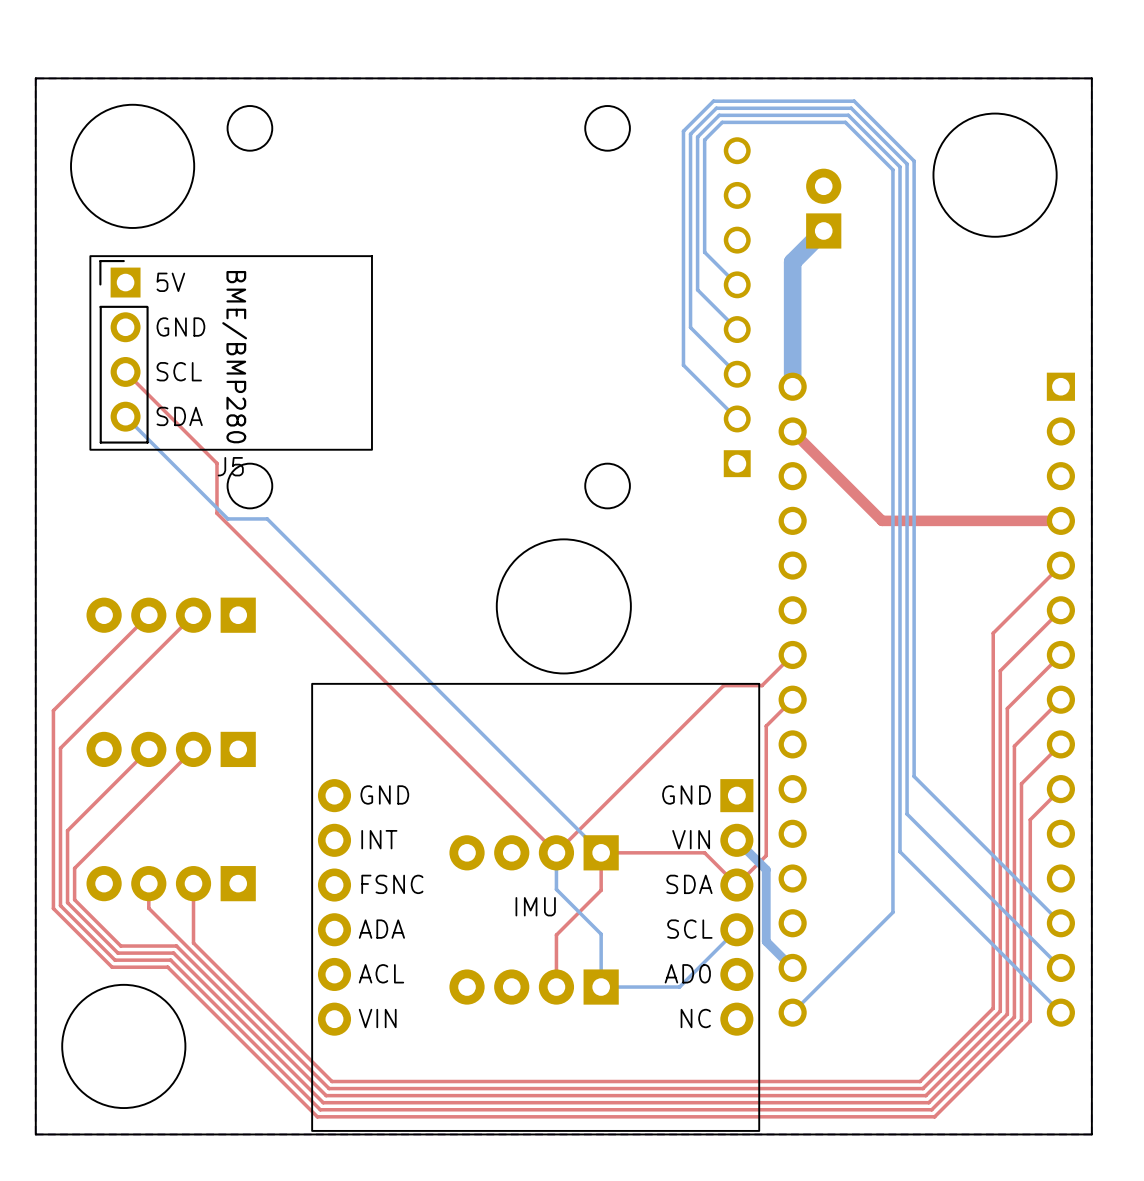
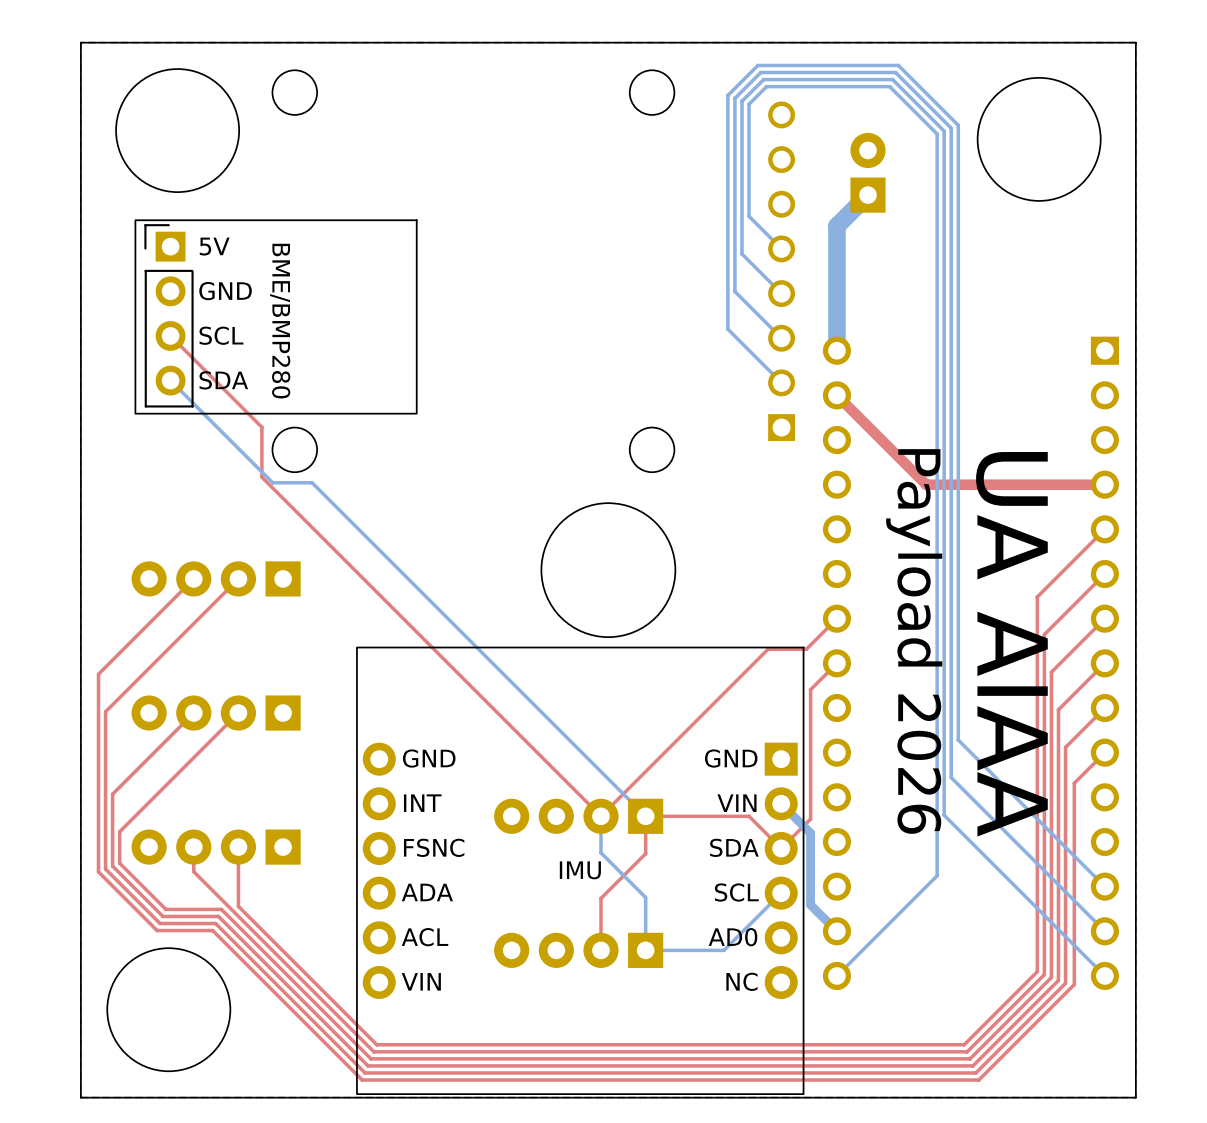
J5 name: J5 (230, 466) -> none
text: none -> Payload 2026 (914, 641)
text: none -> UA AIAA (1011, 644)

